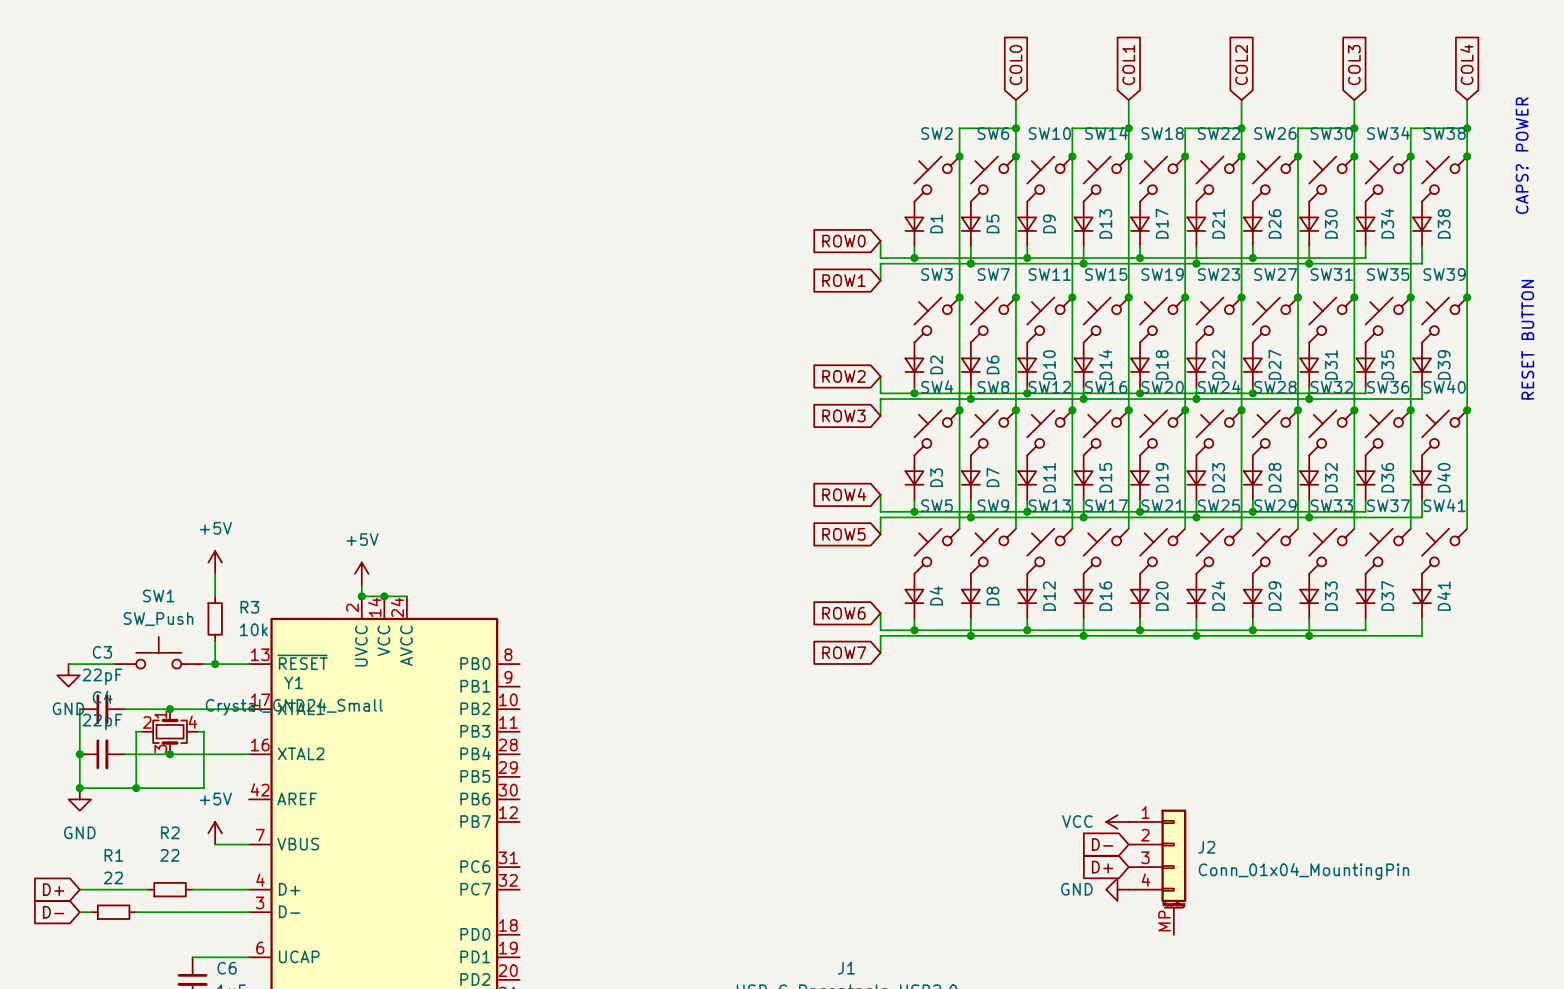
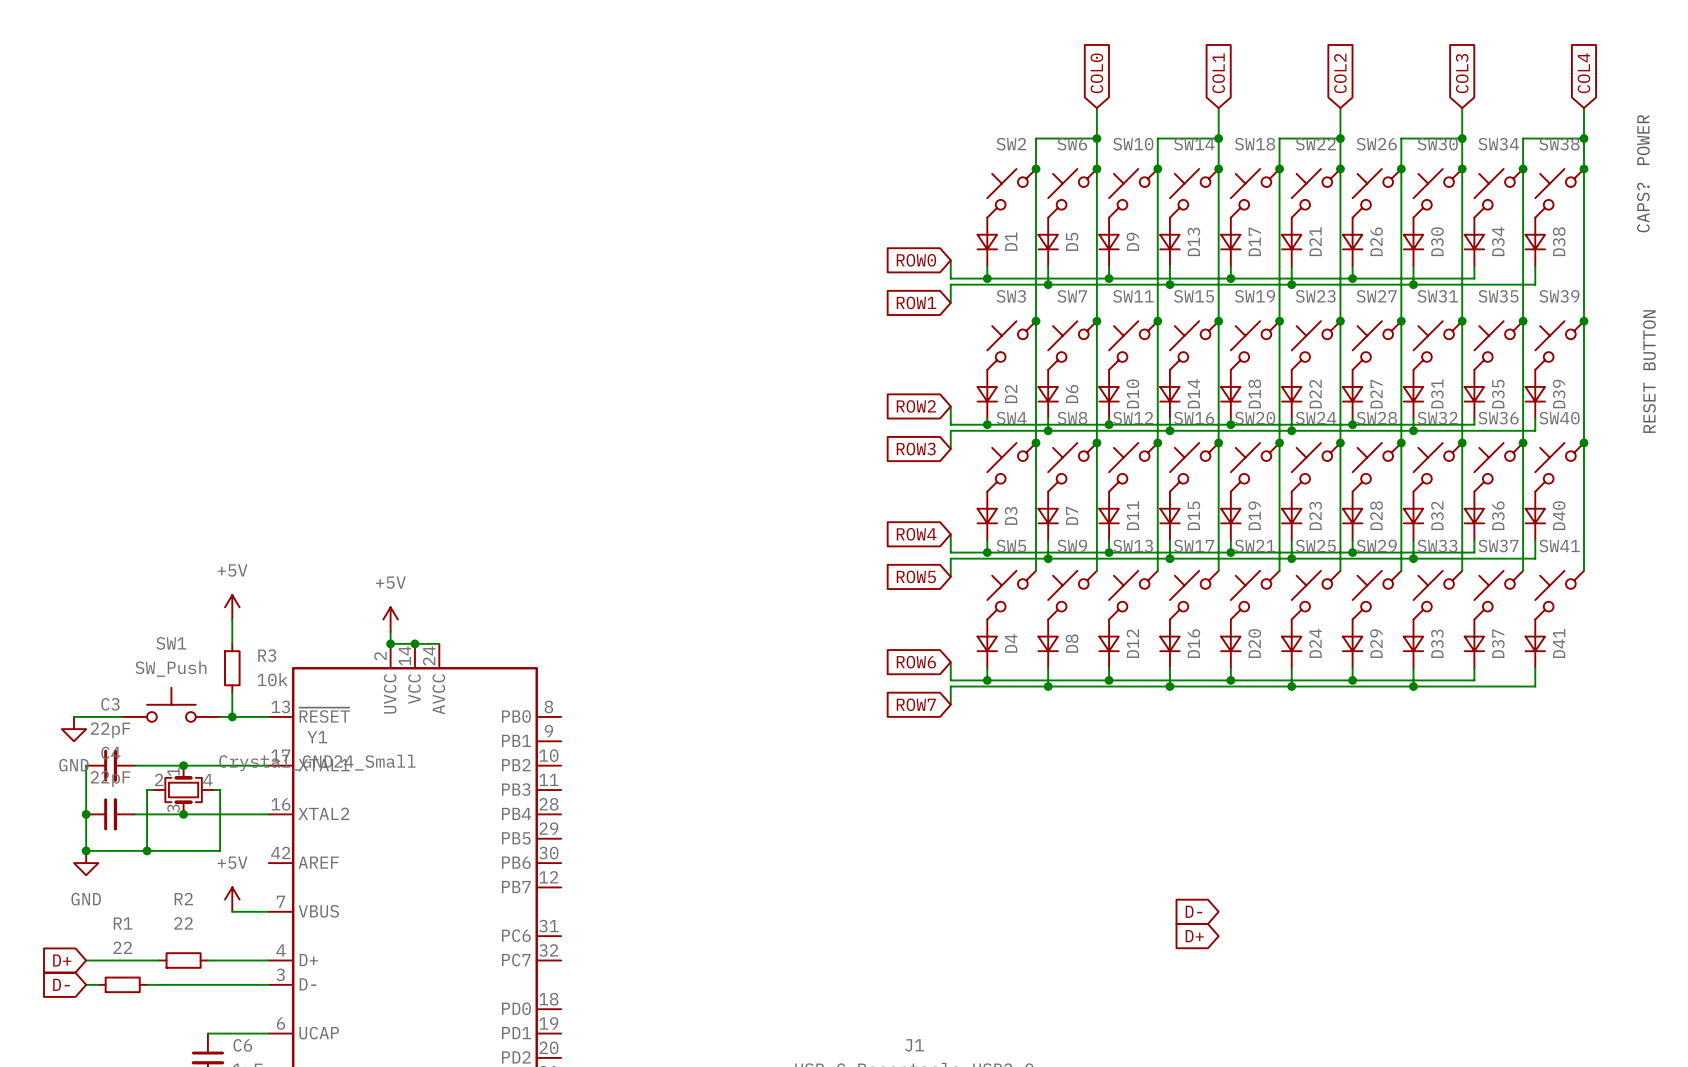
power symbol: VCC (1117, 821) -> none
J2: Conn_01x04_MountingPin (1157, 872) -> none
power symbol: GND (1117, 889) -> none

